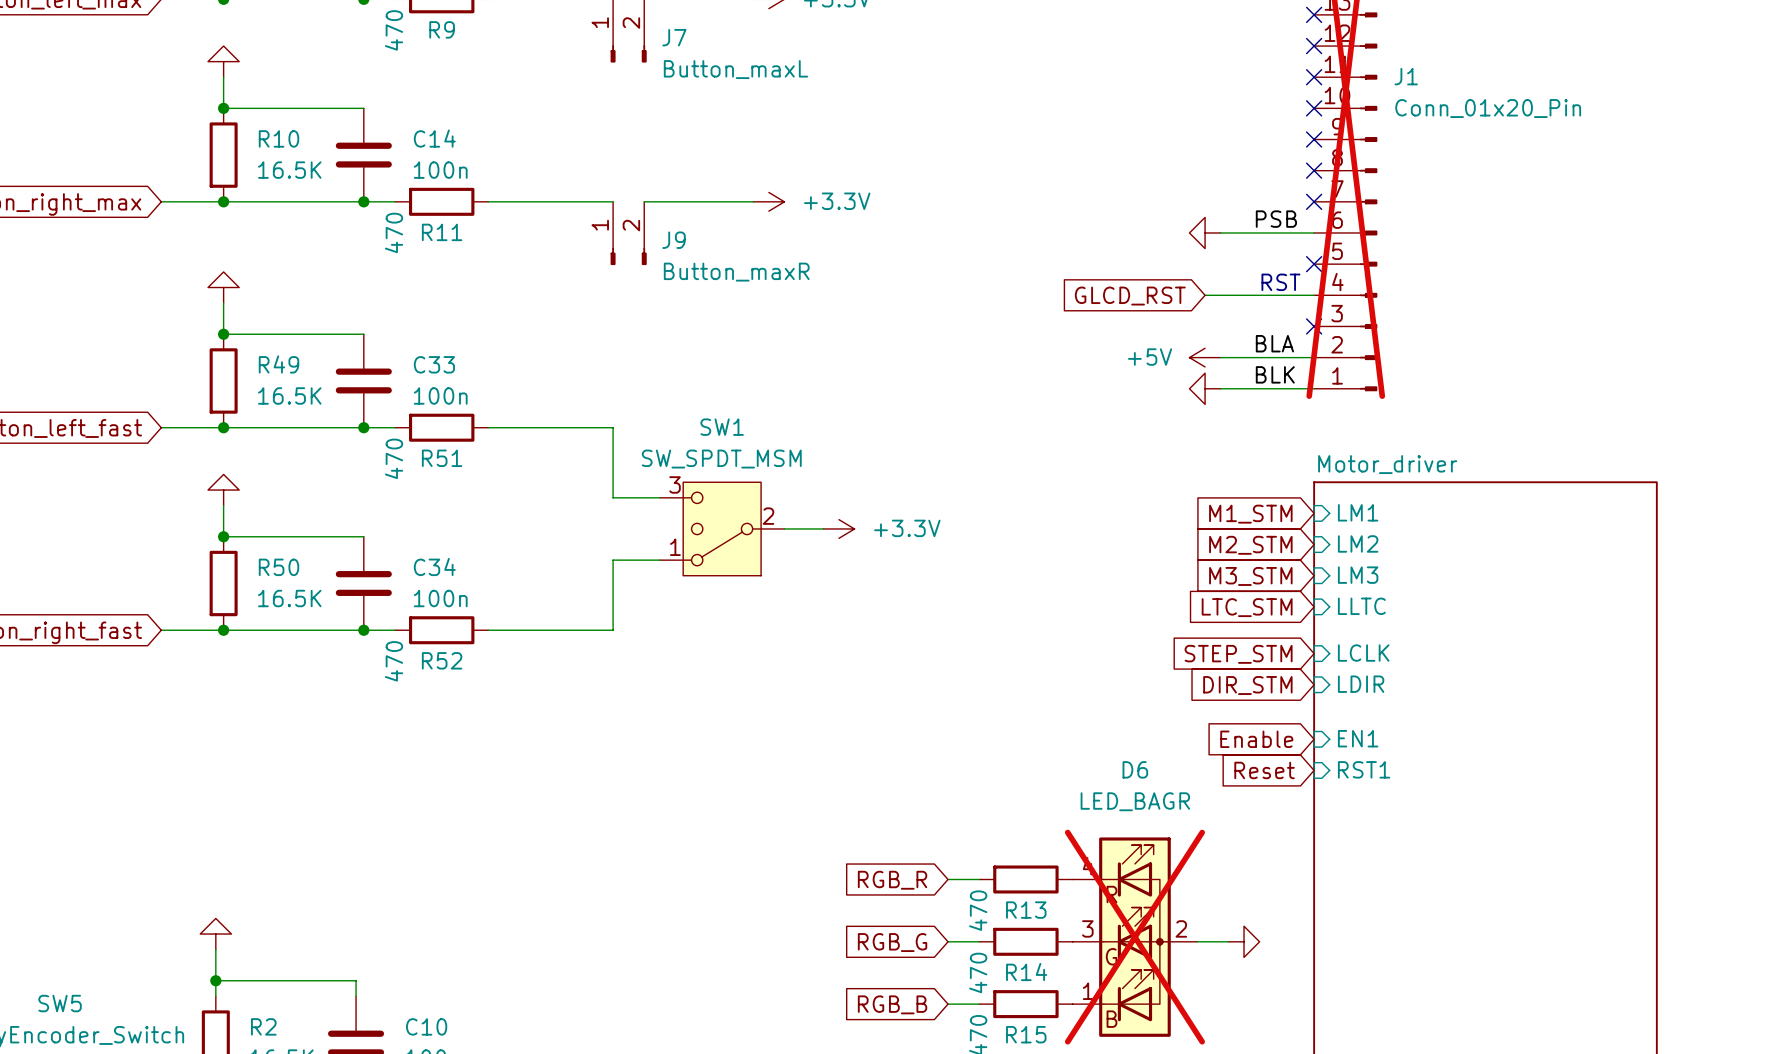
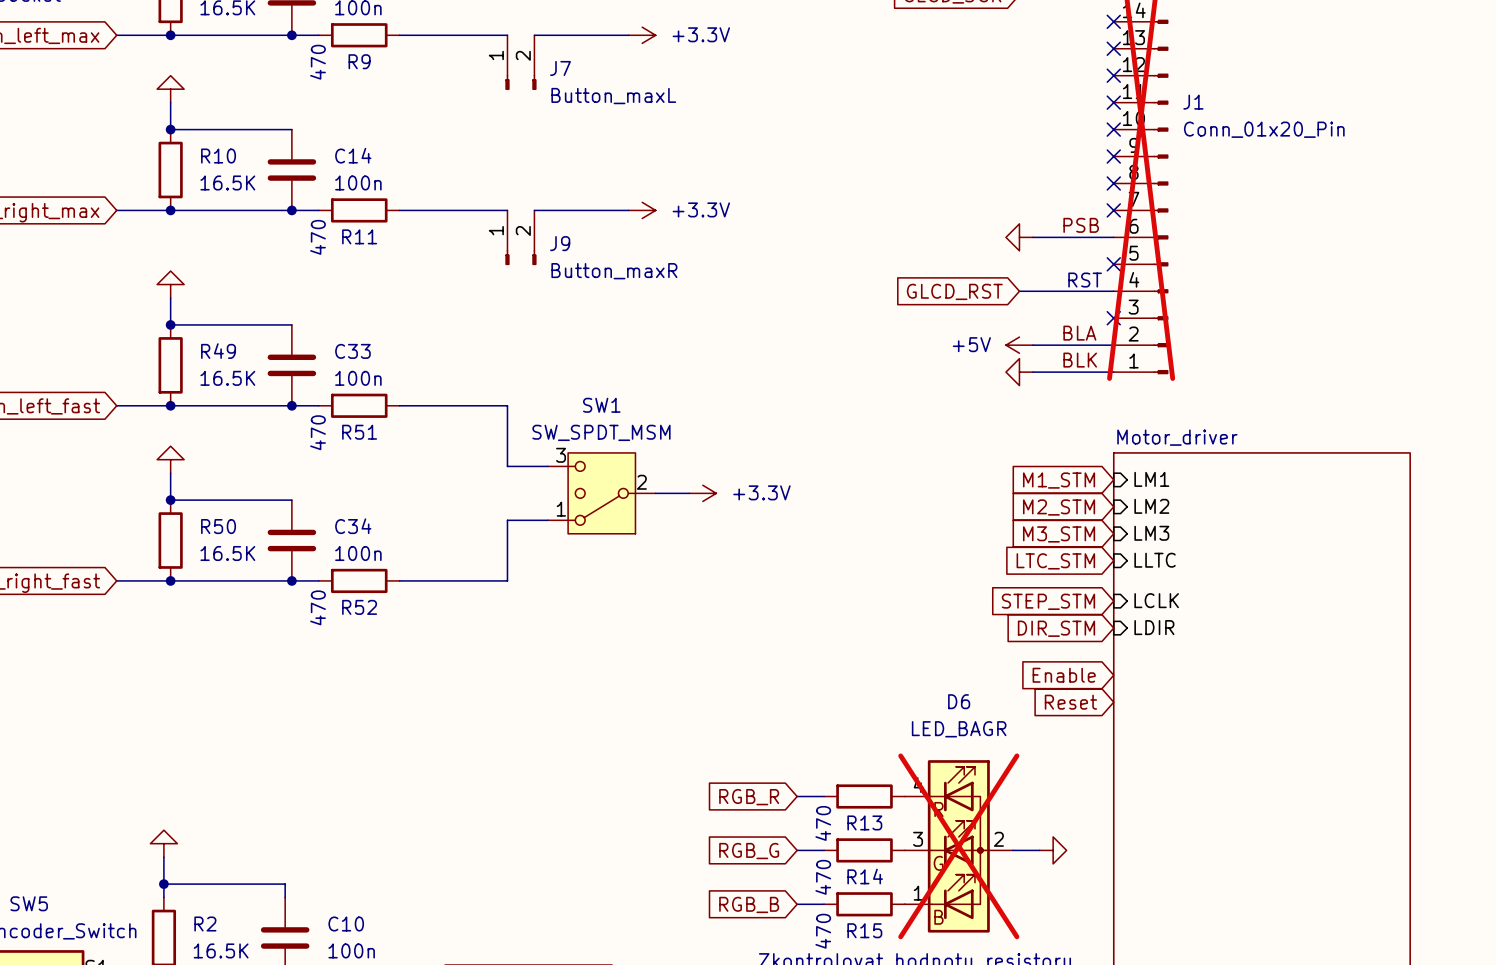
sheet pin: EN1 (1358, 738) -> none
sheet pin: RST1 (1364, 769) -> none

